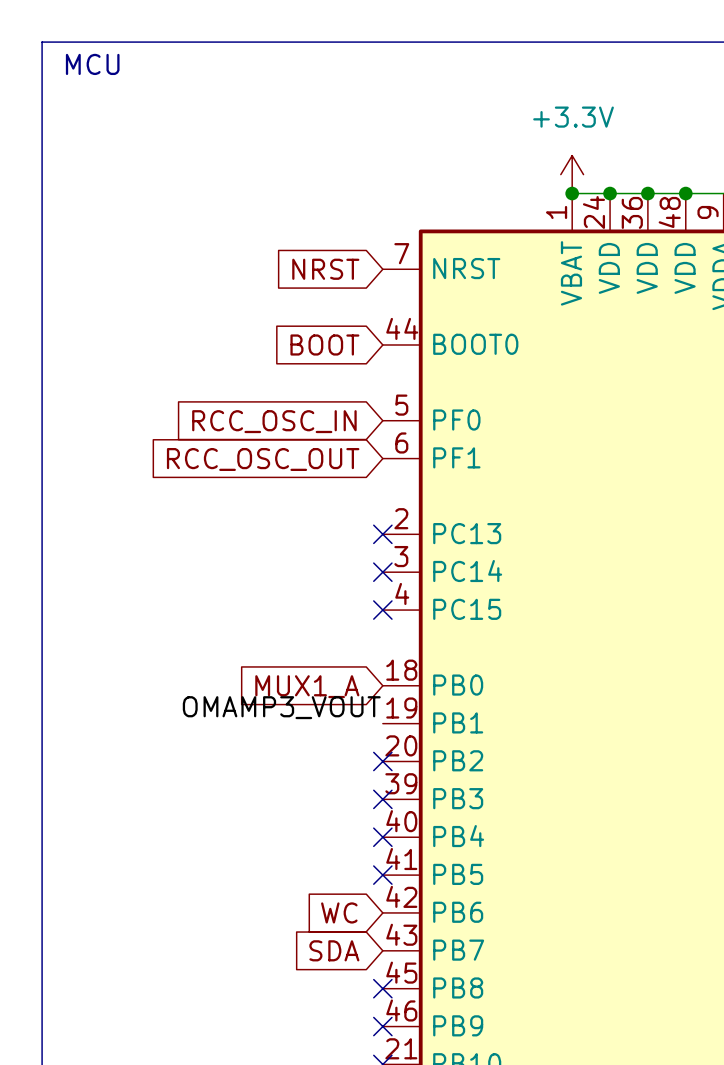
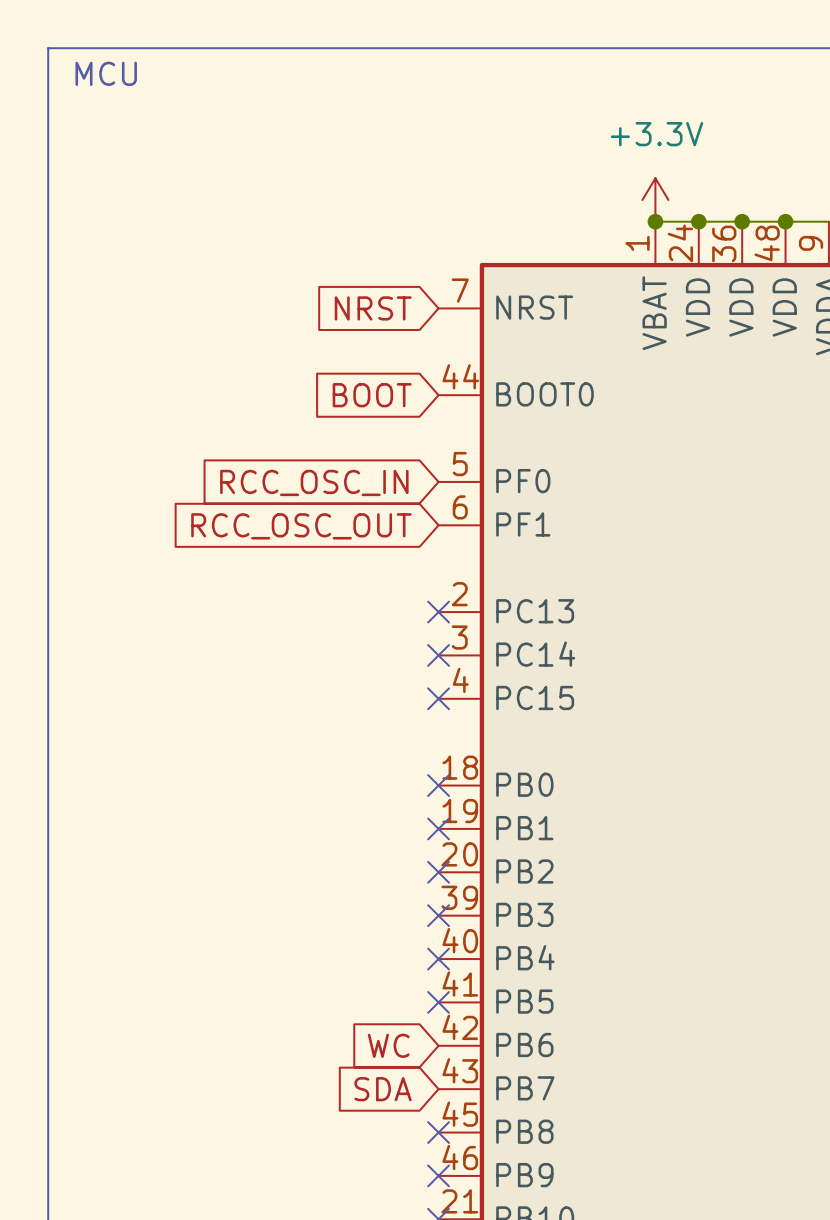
no-connect mark: none -> (438, 785)
global label: MUX1_A (307, 686) -> none
label: OMAMP3_VOUT (281, 707) -> none
no-connect mark: none -> (438, 828)

